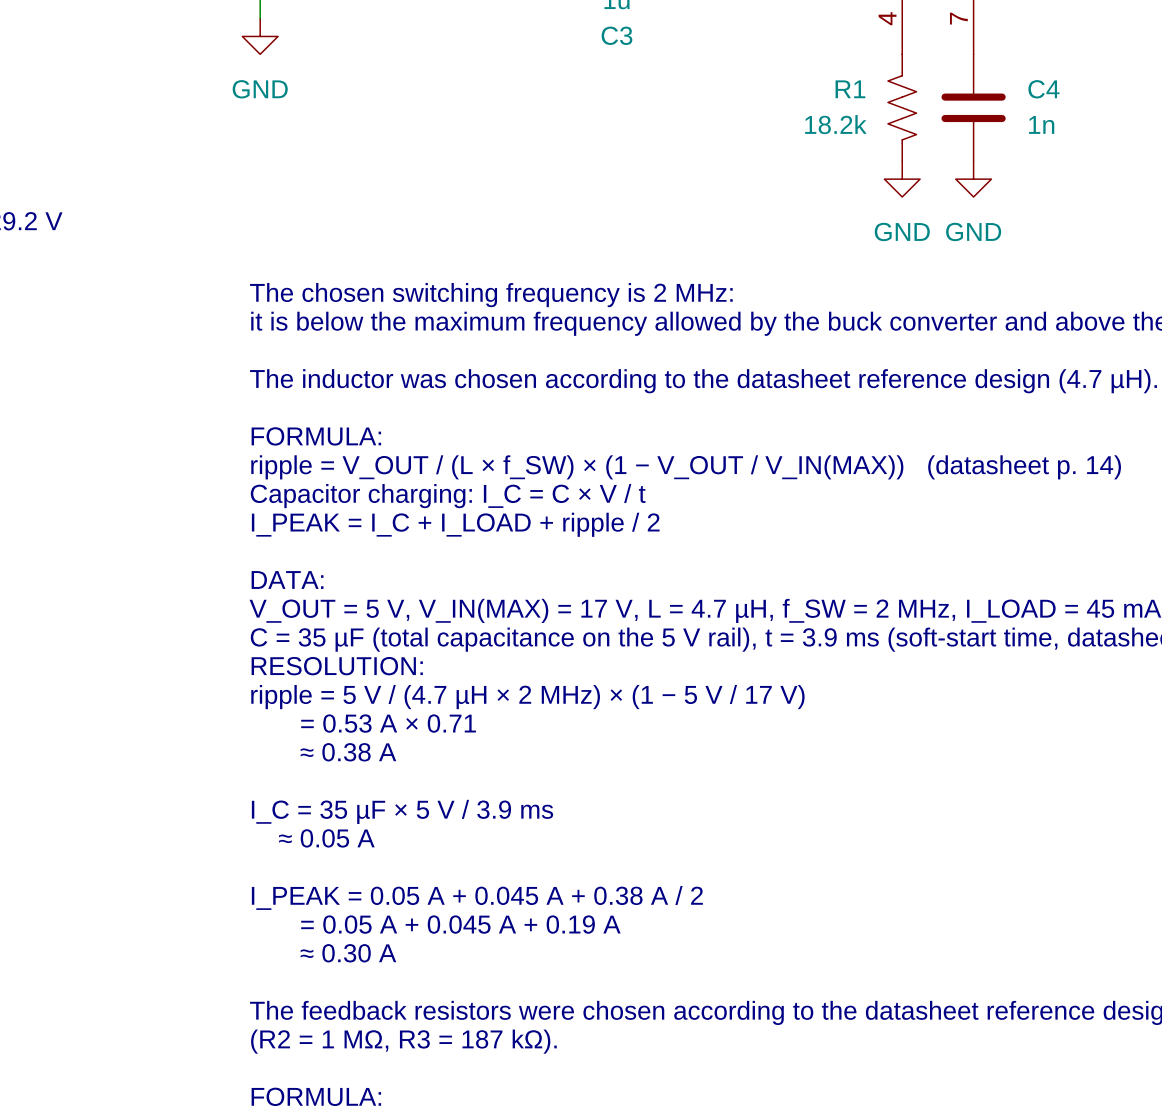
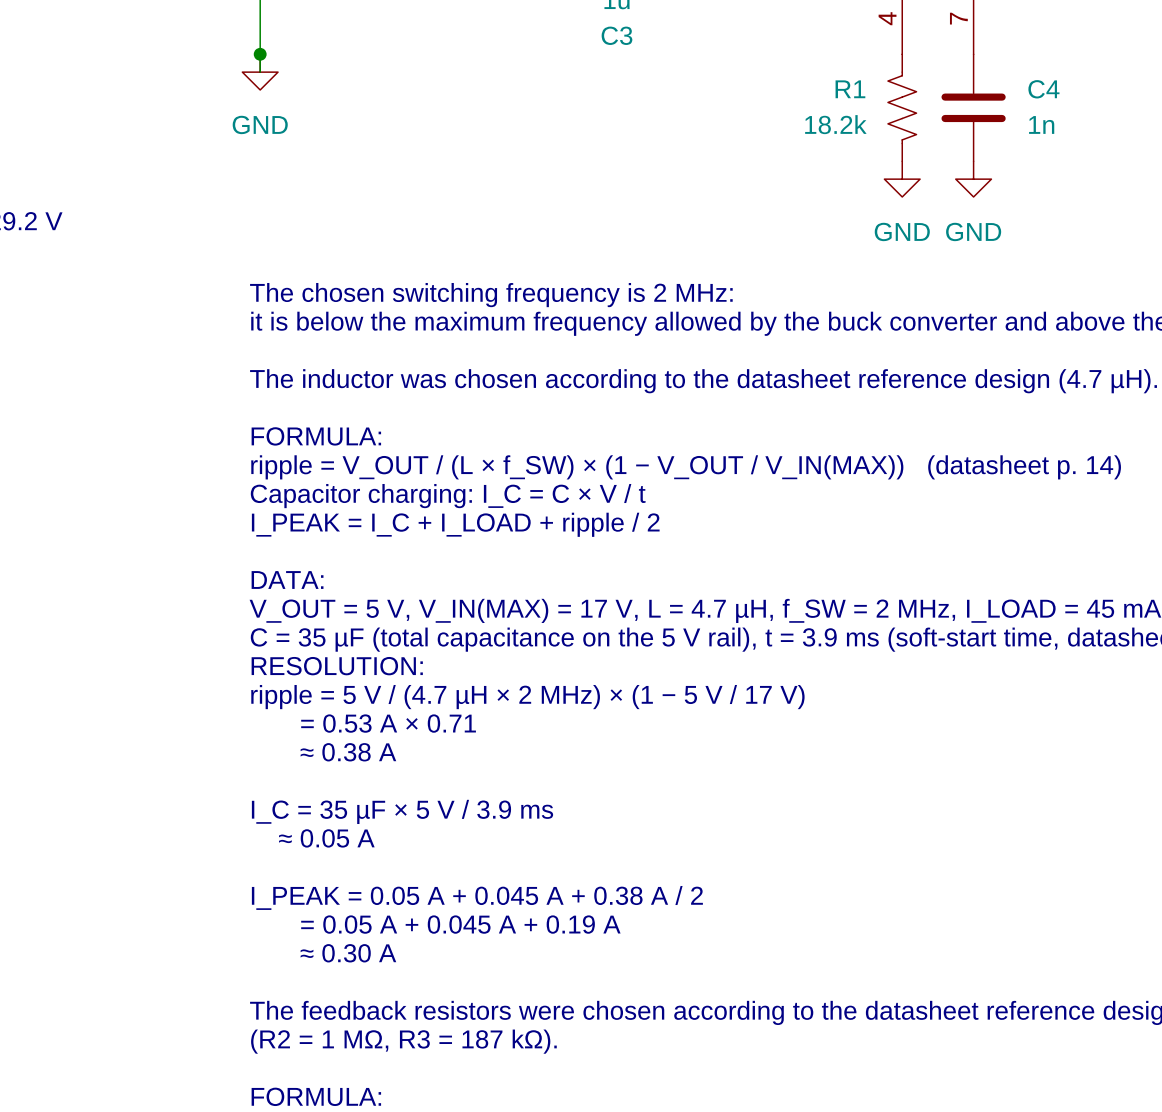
wire: none -> (260, 18) (260, 72)
power symbol position: GND (260, 36) -> GND (260, 72)
junction: none -> (260, 54)

